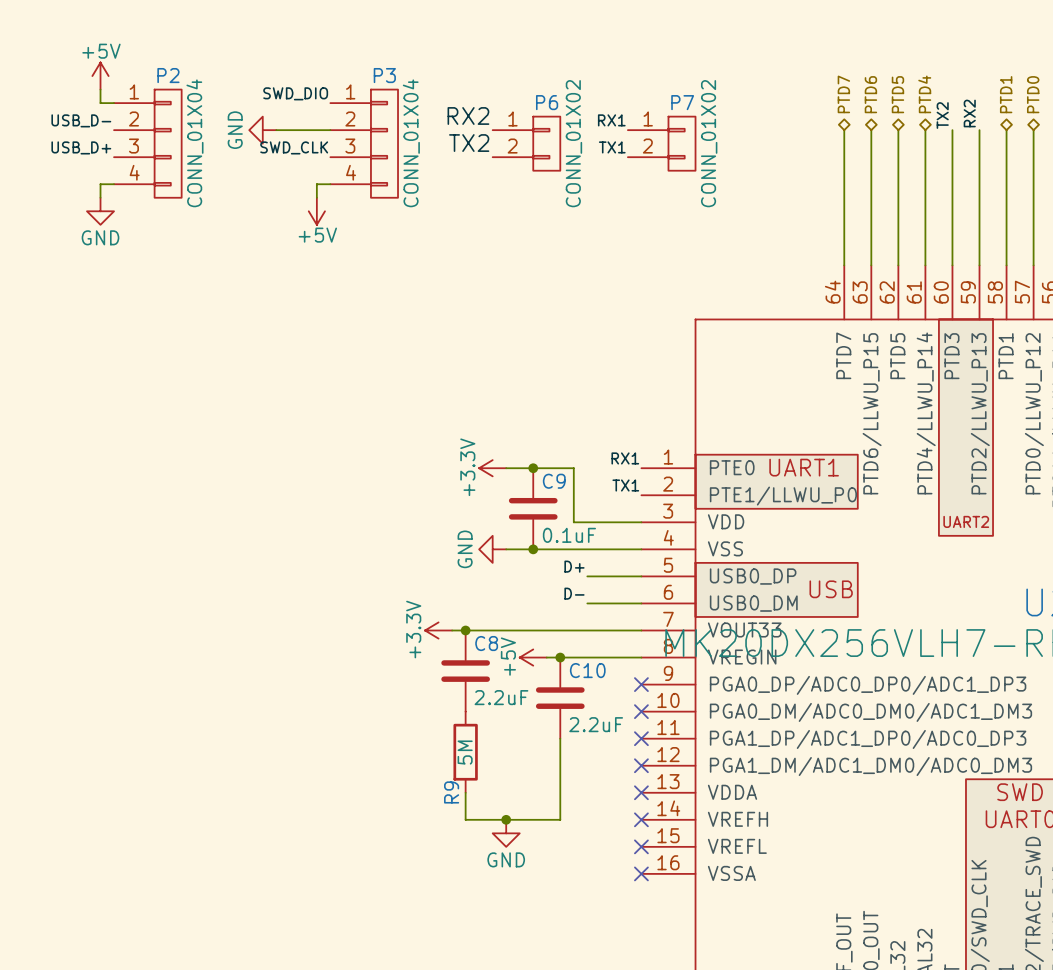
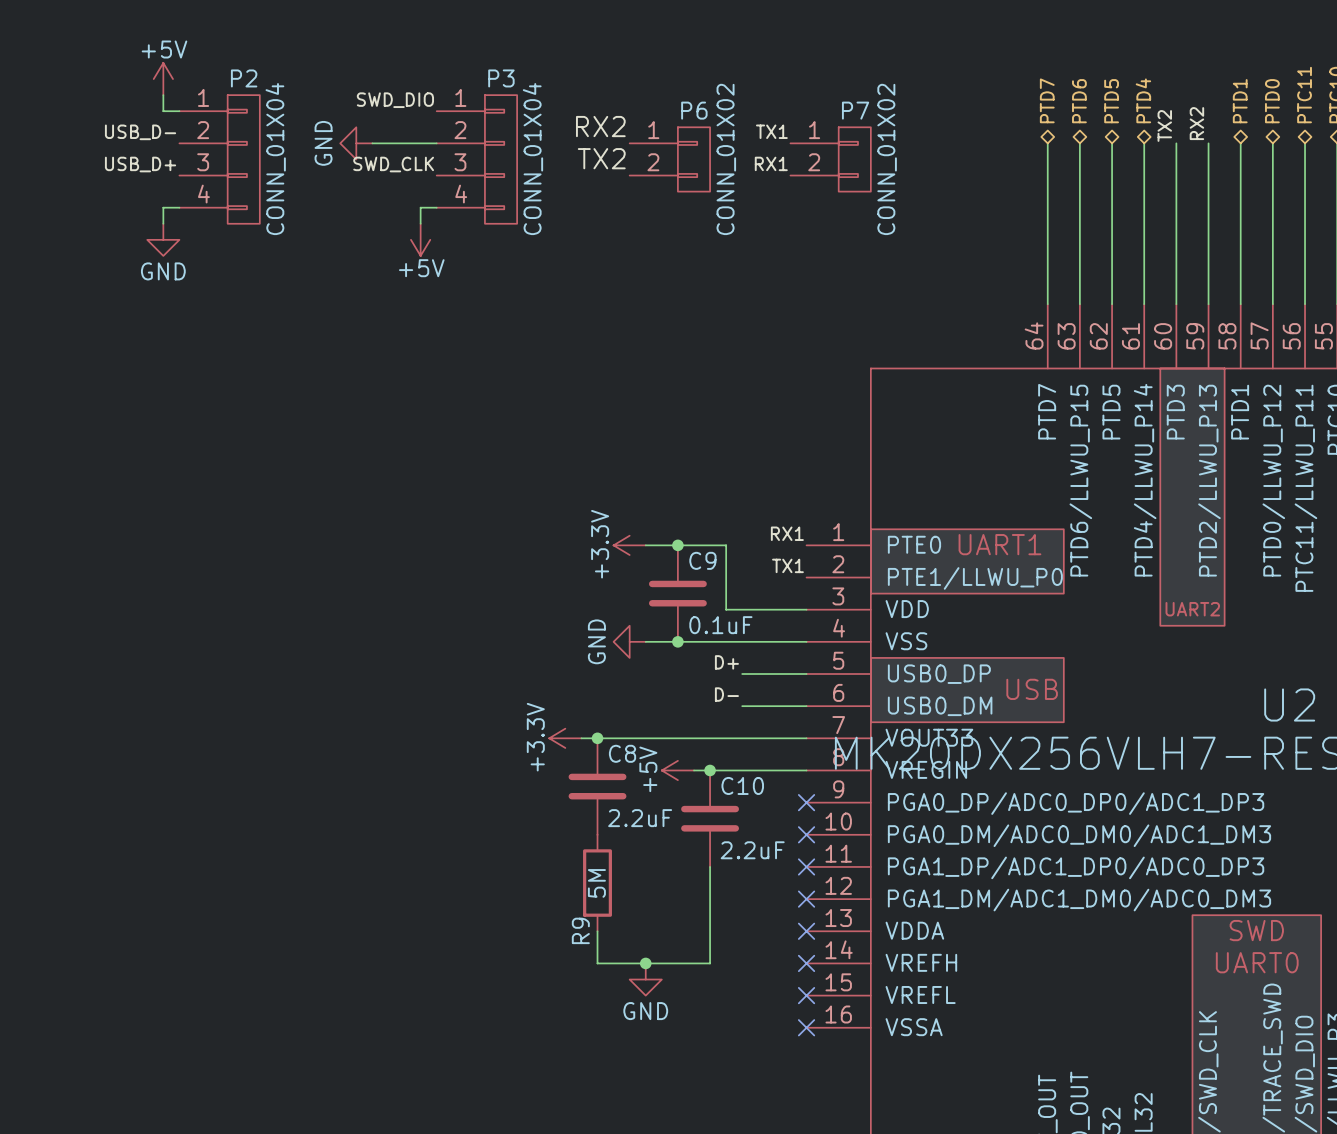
label: RX1 (611, 120) -> TX1 (771, 131)
label: TX1 (612, 147) -> RX1 (771, 163)

